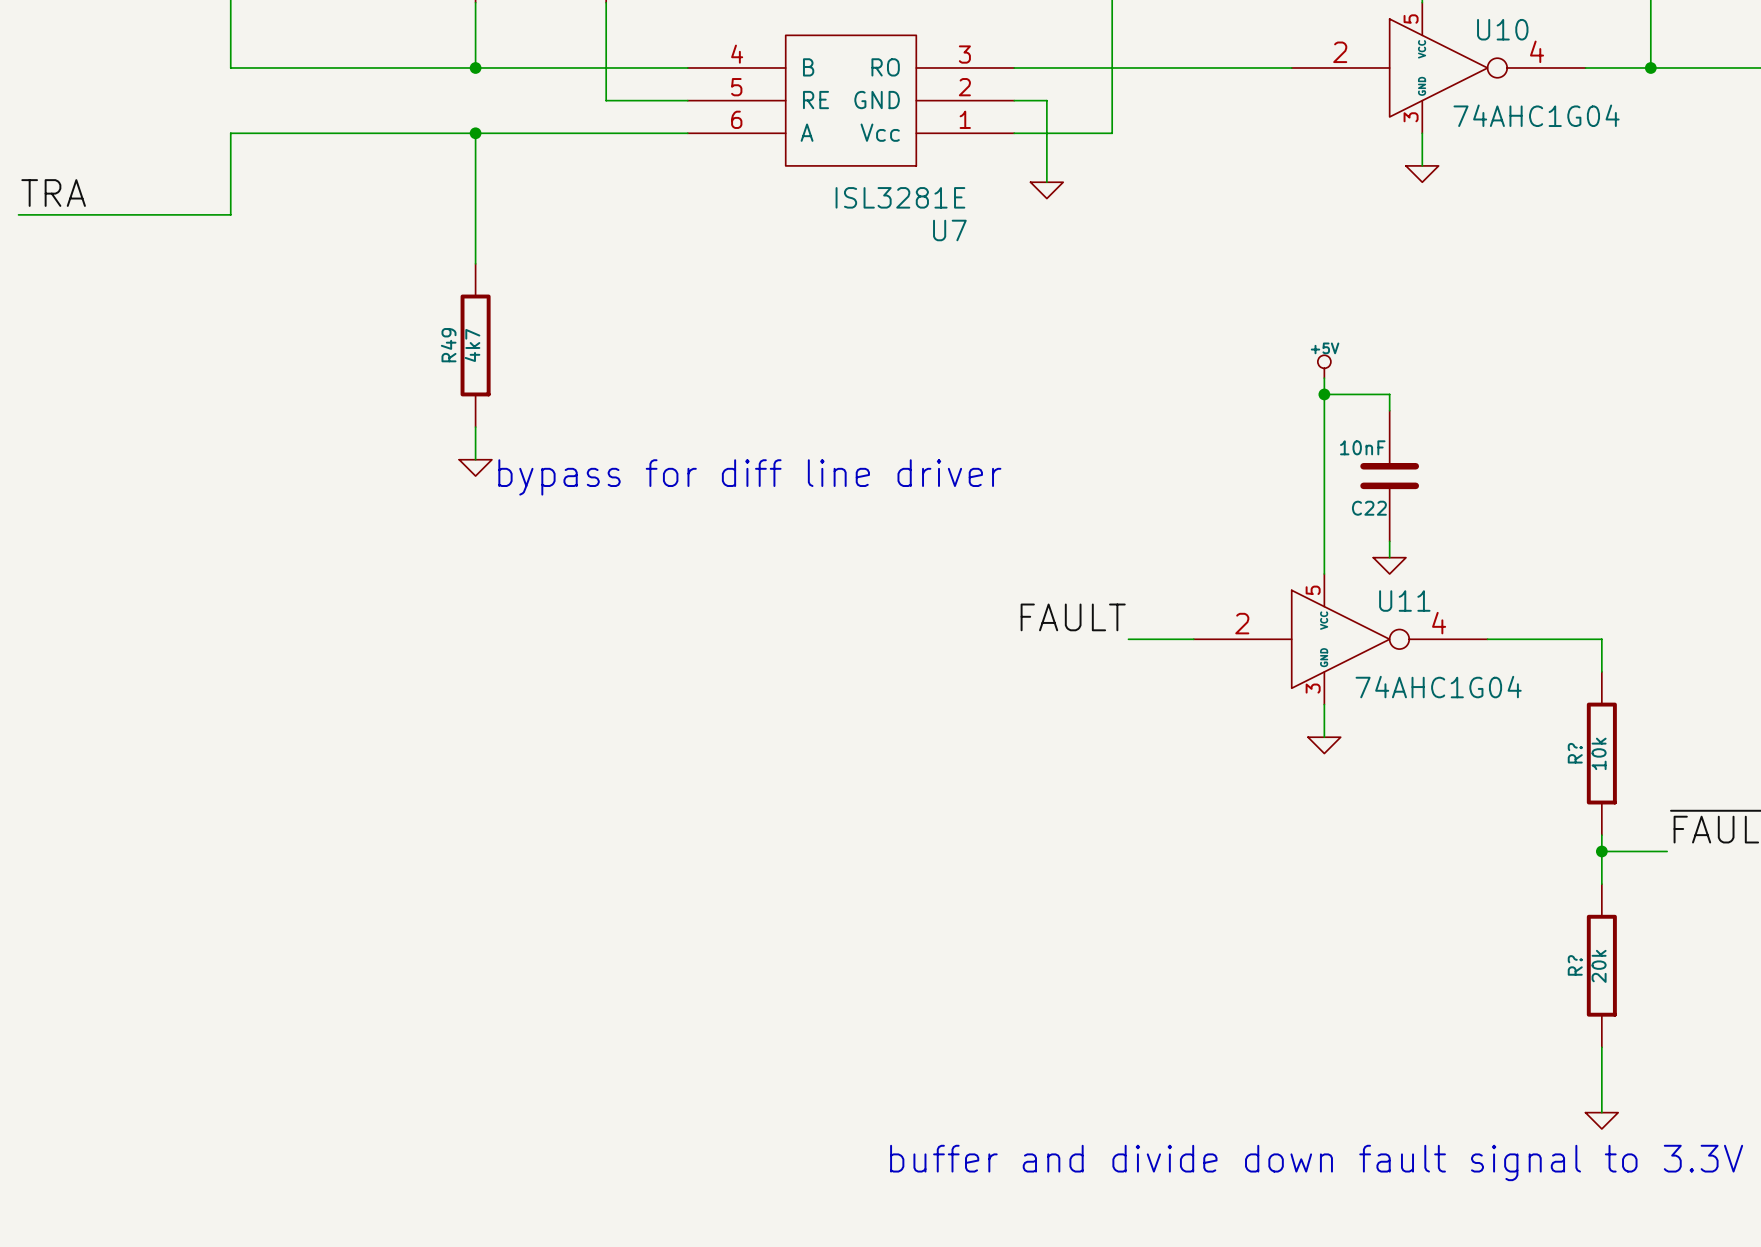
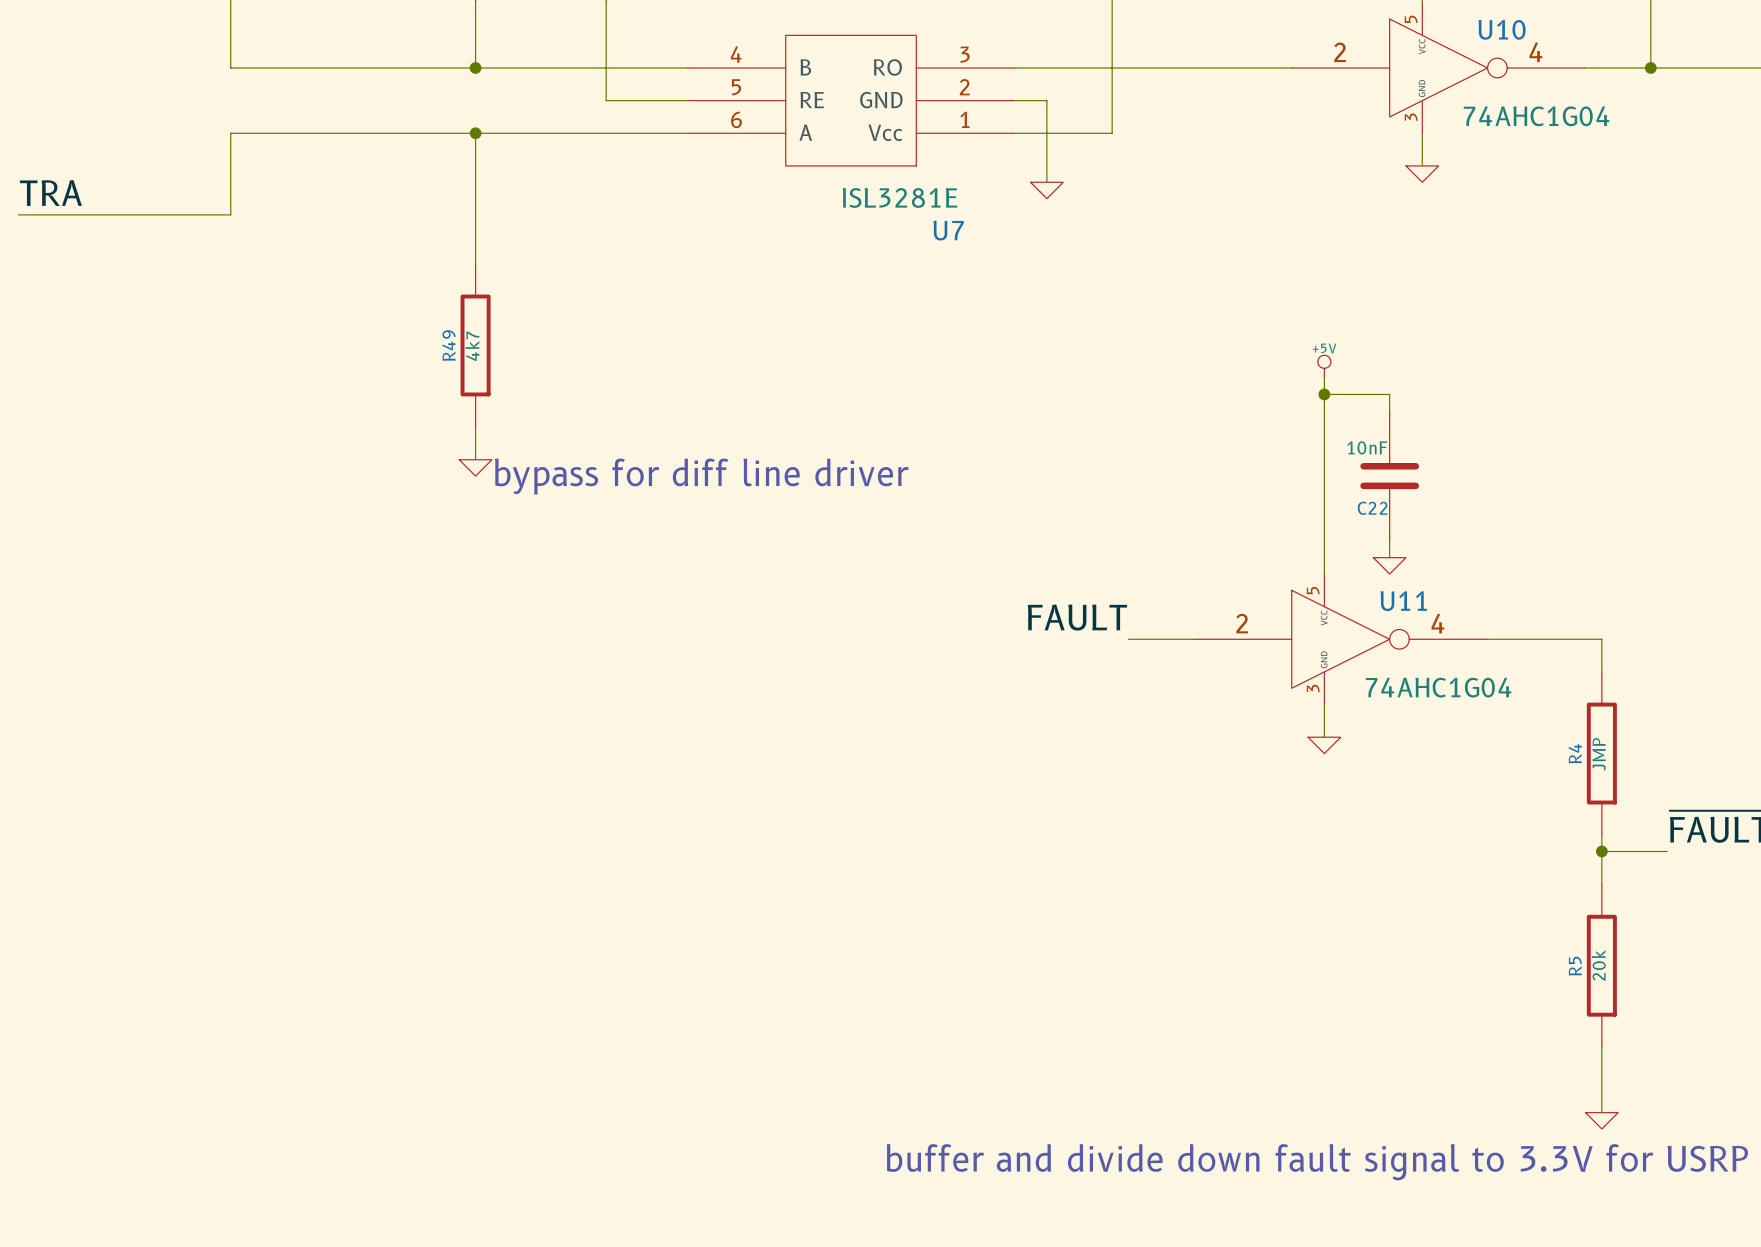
R? name: R? (1575, 753) -> R4 (1575, 753)
R? value: 10k (1599, 753) -> JMP (1599, 754)
R? name: R? (1575, 965) -> R5 (1575, 966)

